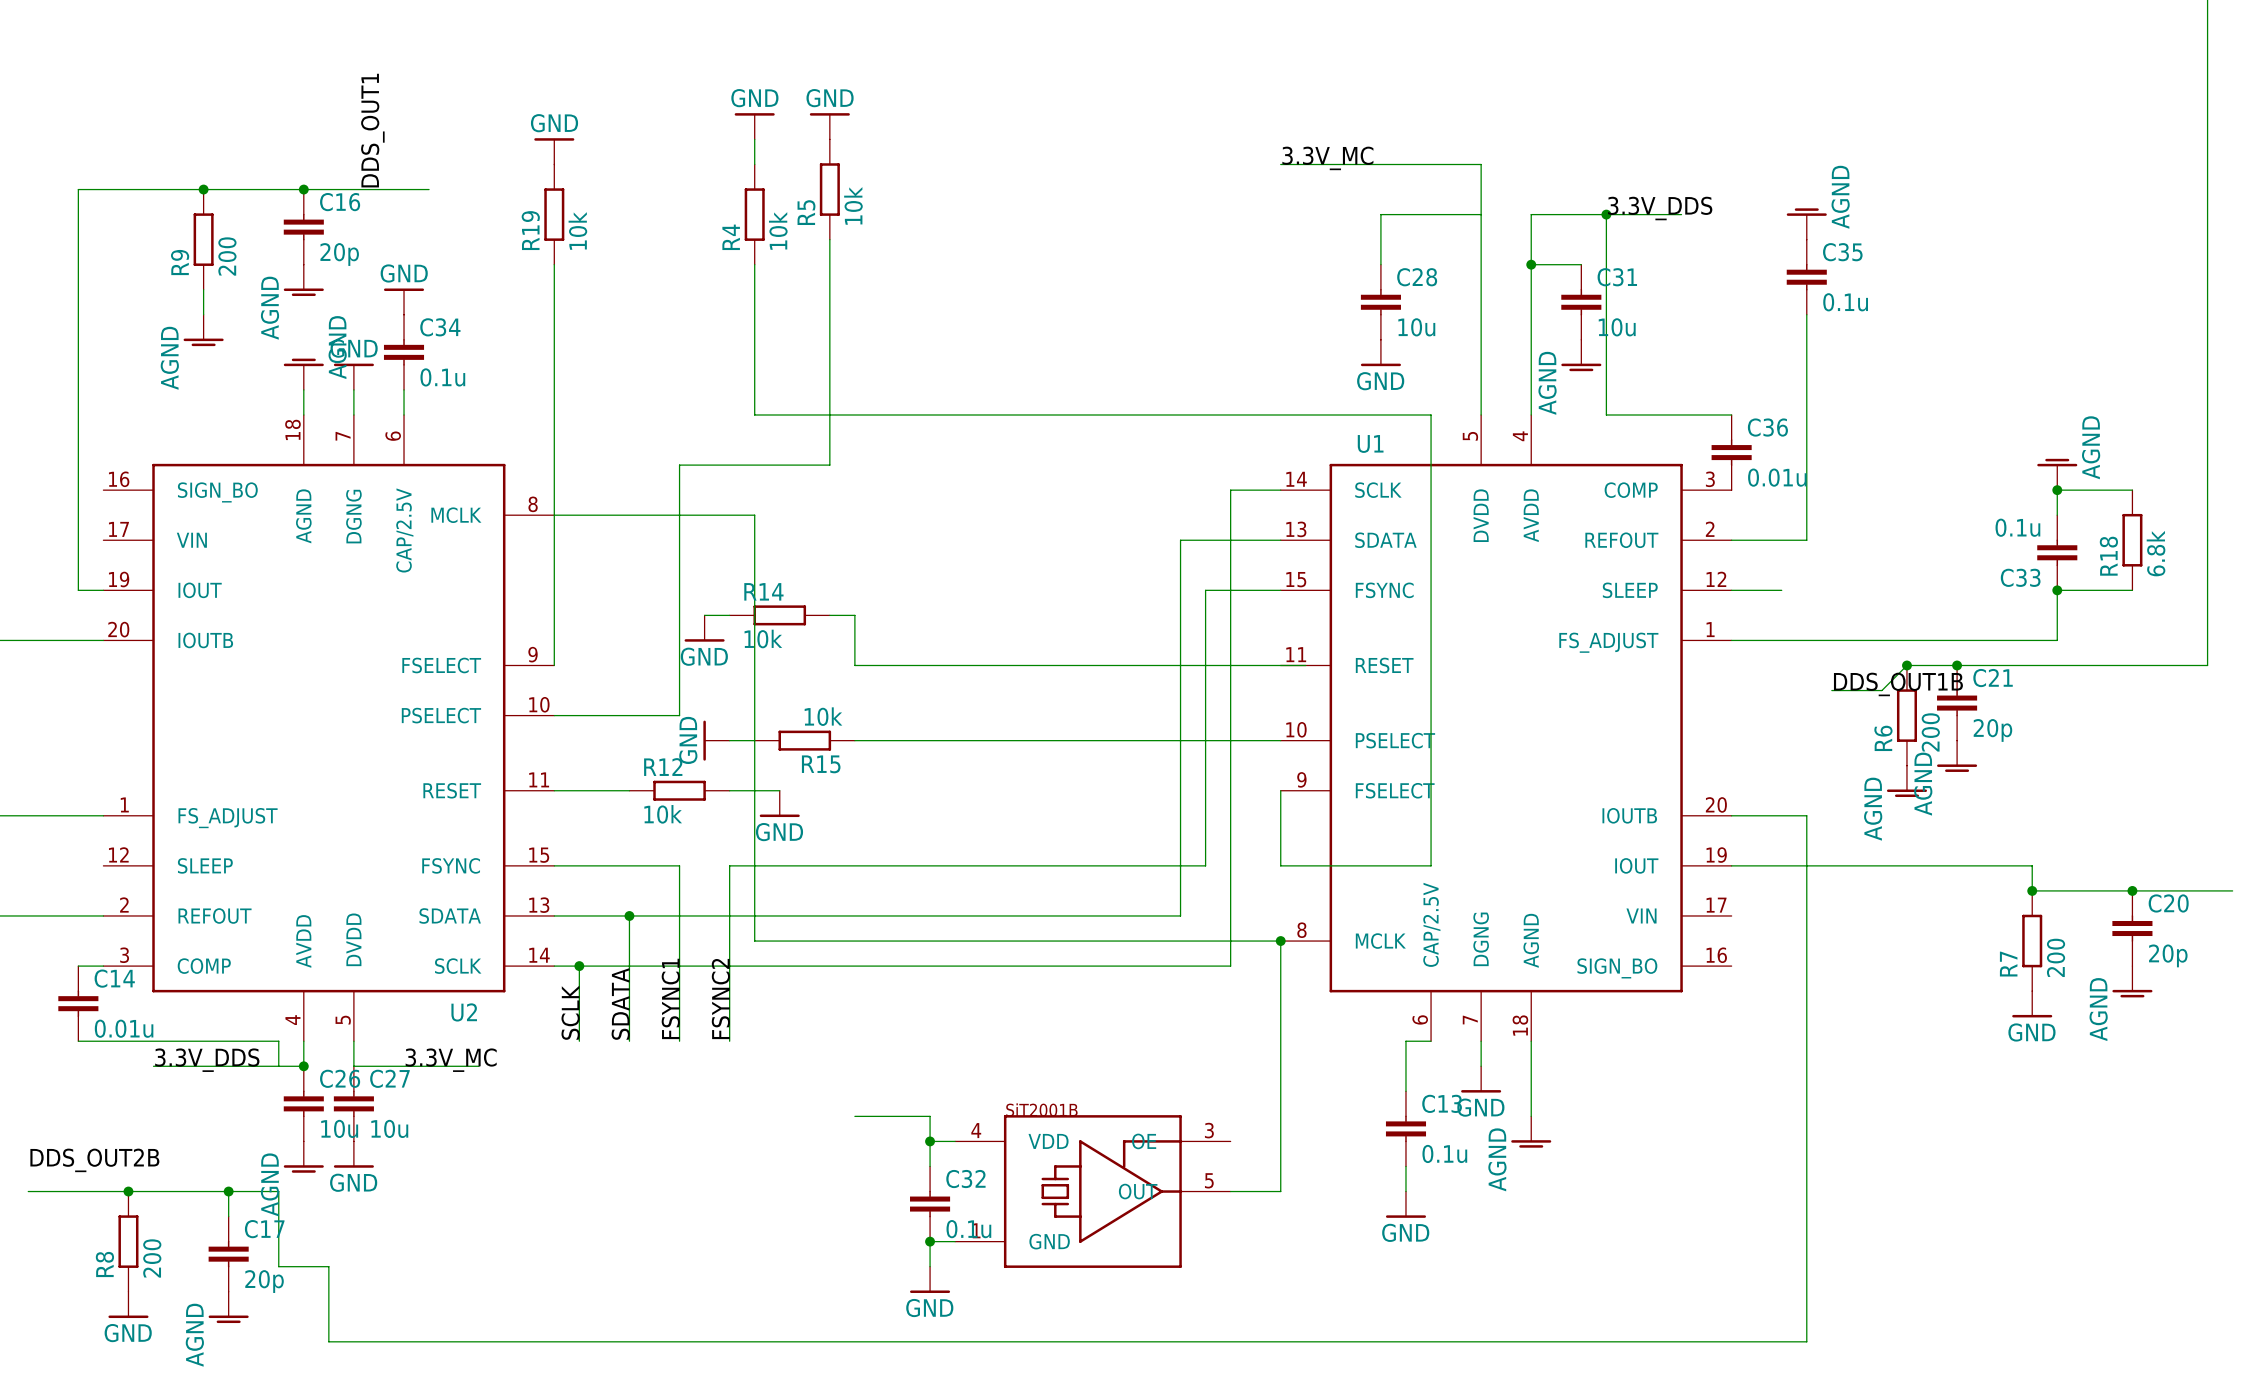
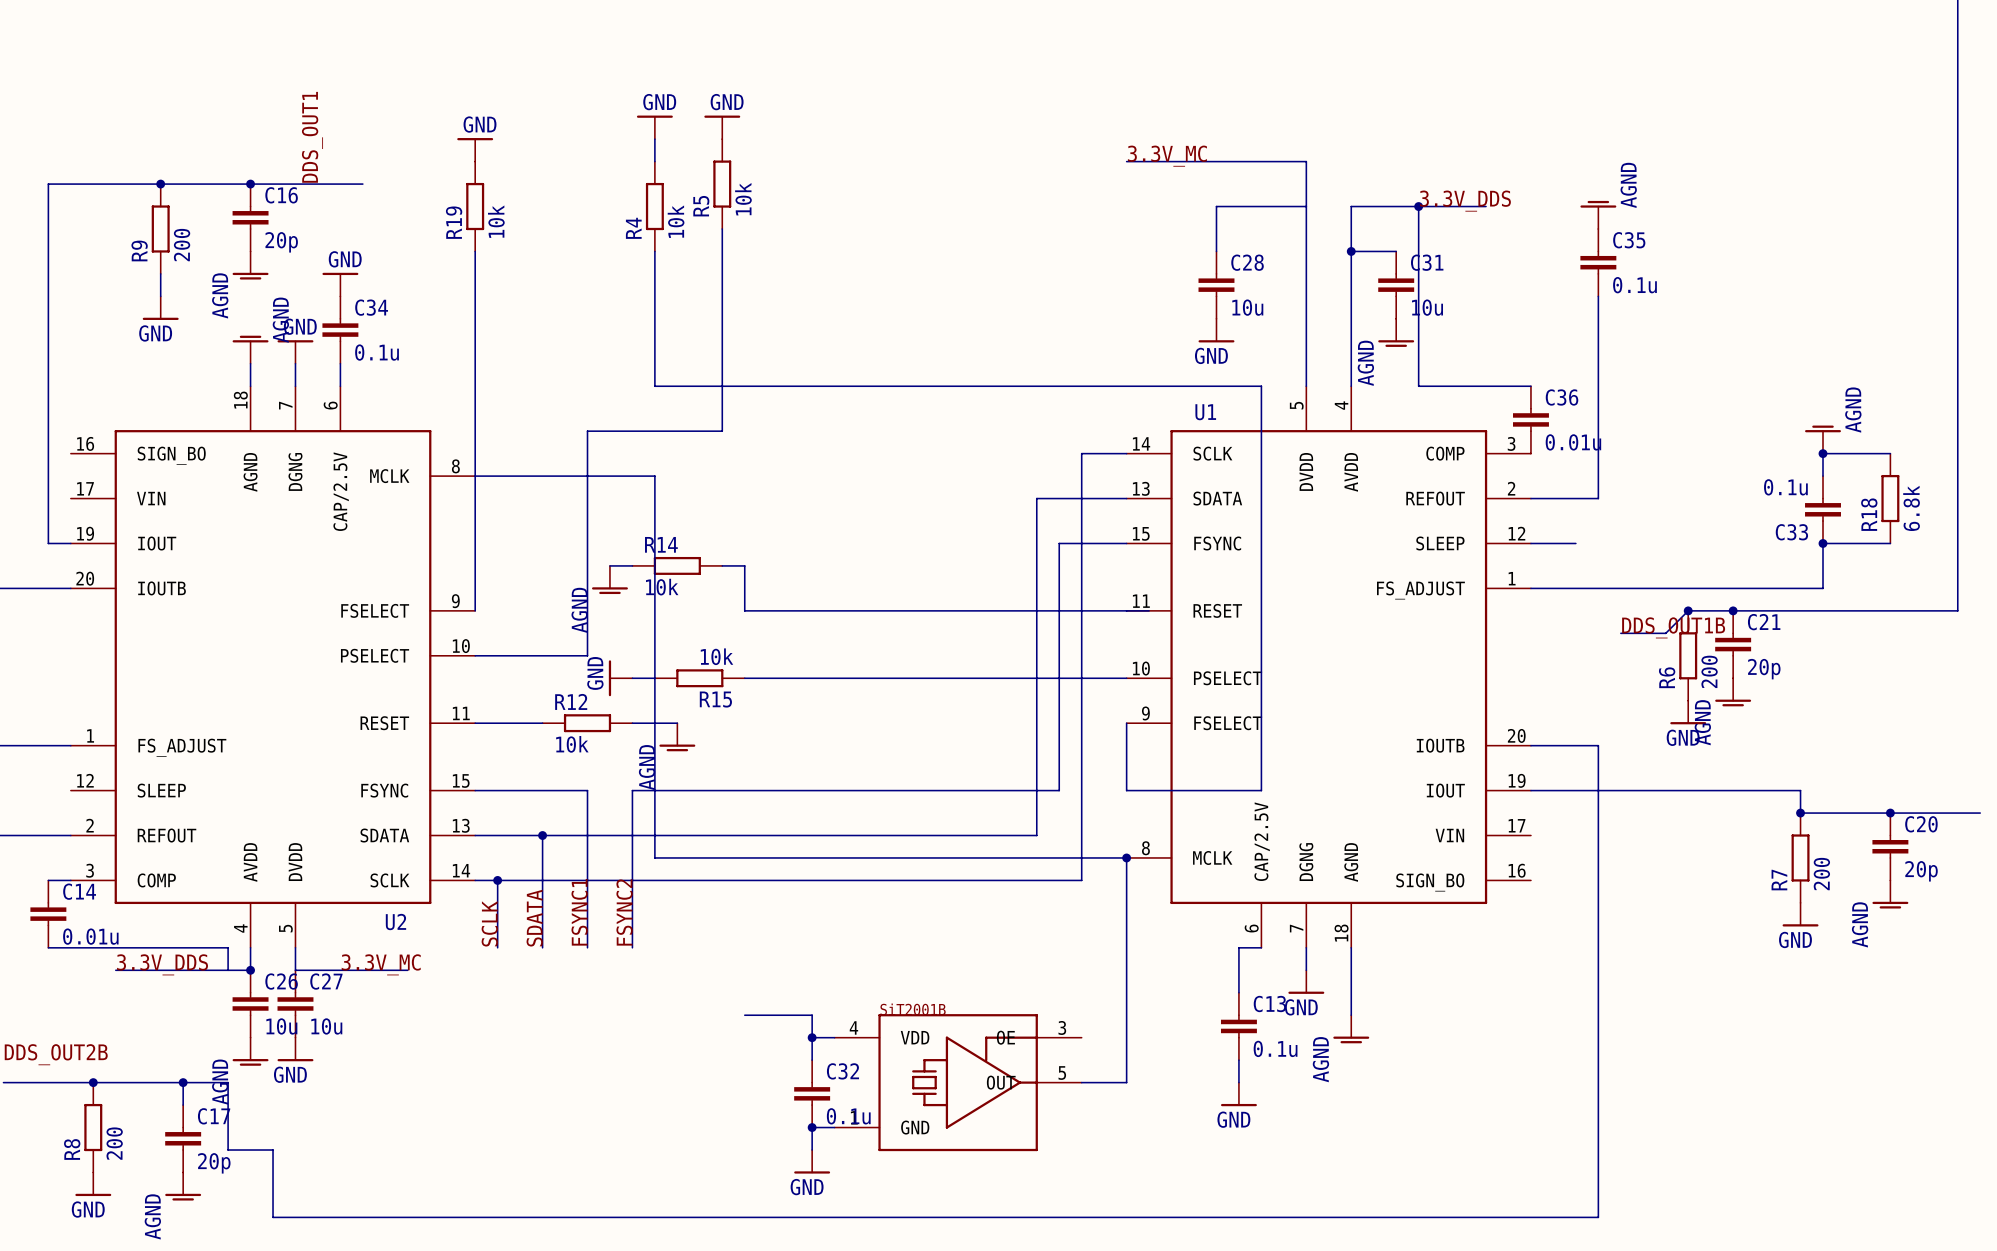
power symbol: AGND (203, 330) -> GND (160, 308)
power symbol: GND (704, 628) -> AGND (609, 579)
power symbol: AGND (1906, 781) -> GND (1688, 712)
power symbol: GND (779, 803) -> AGND (677, 737)

